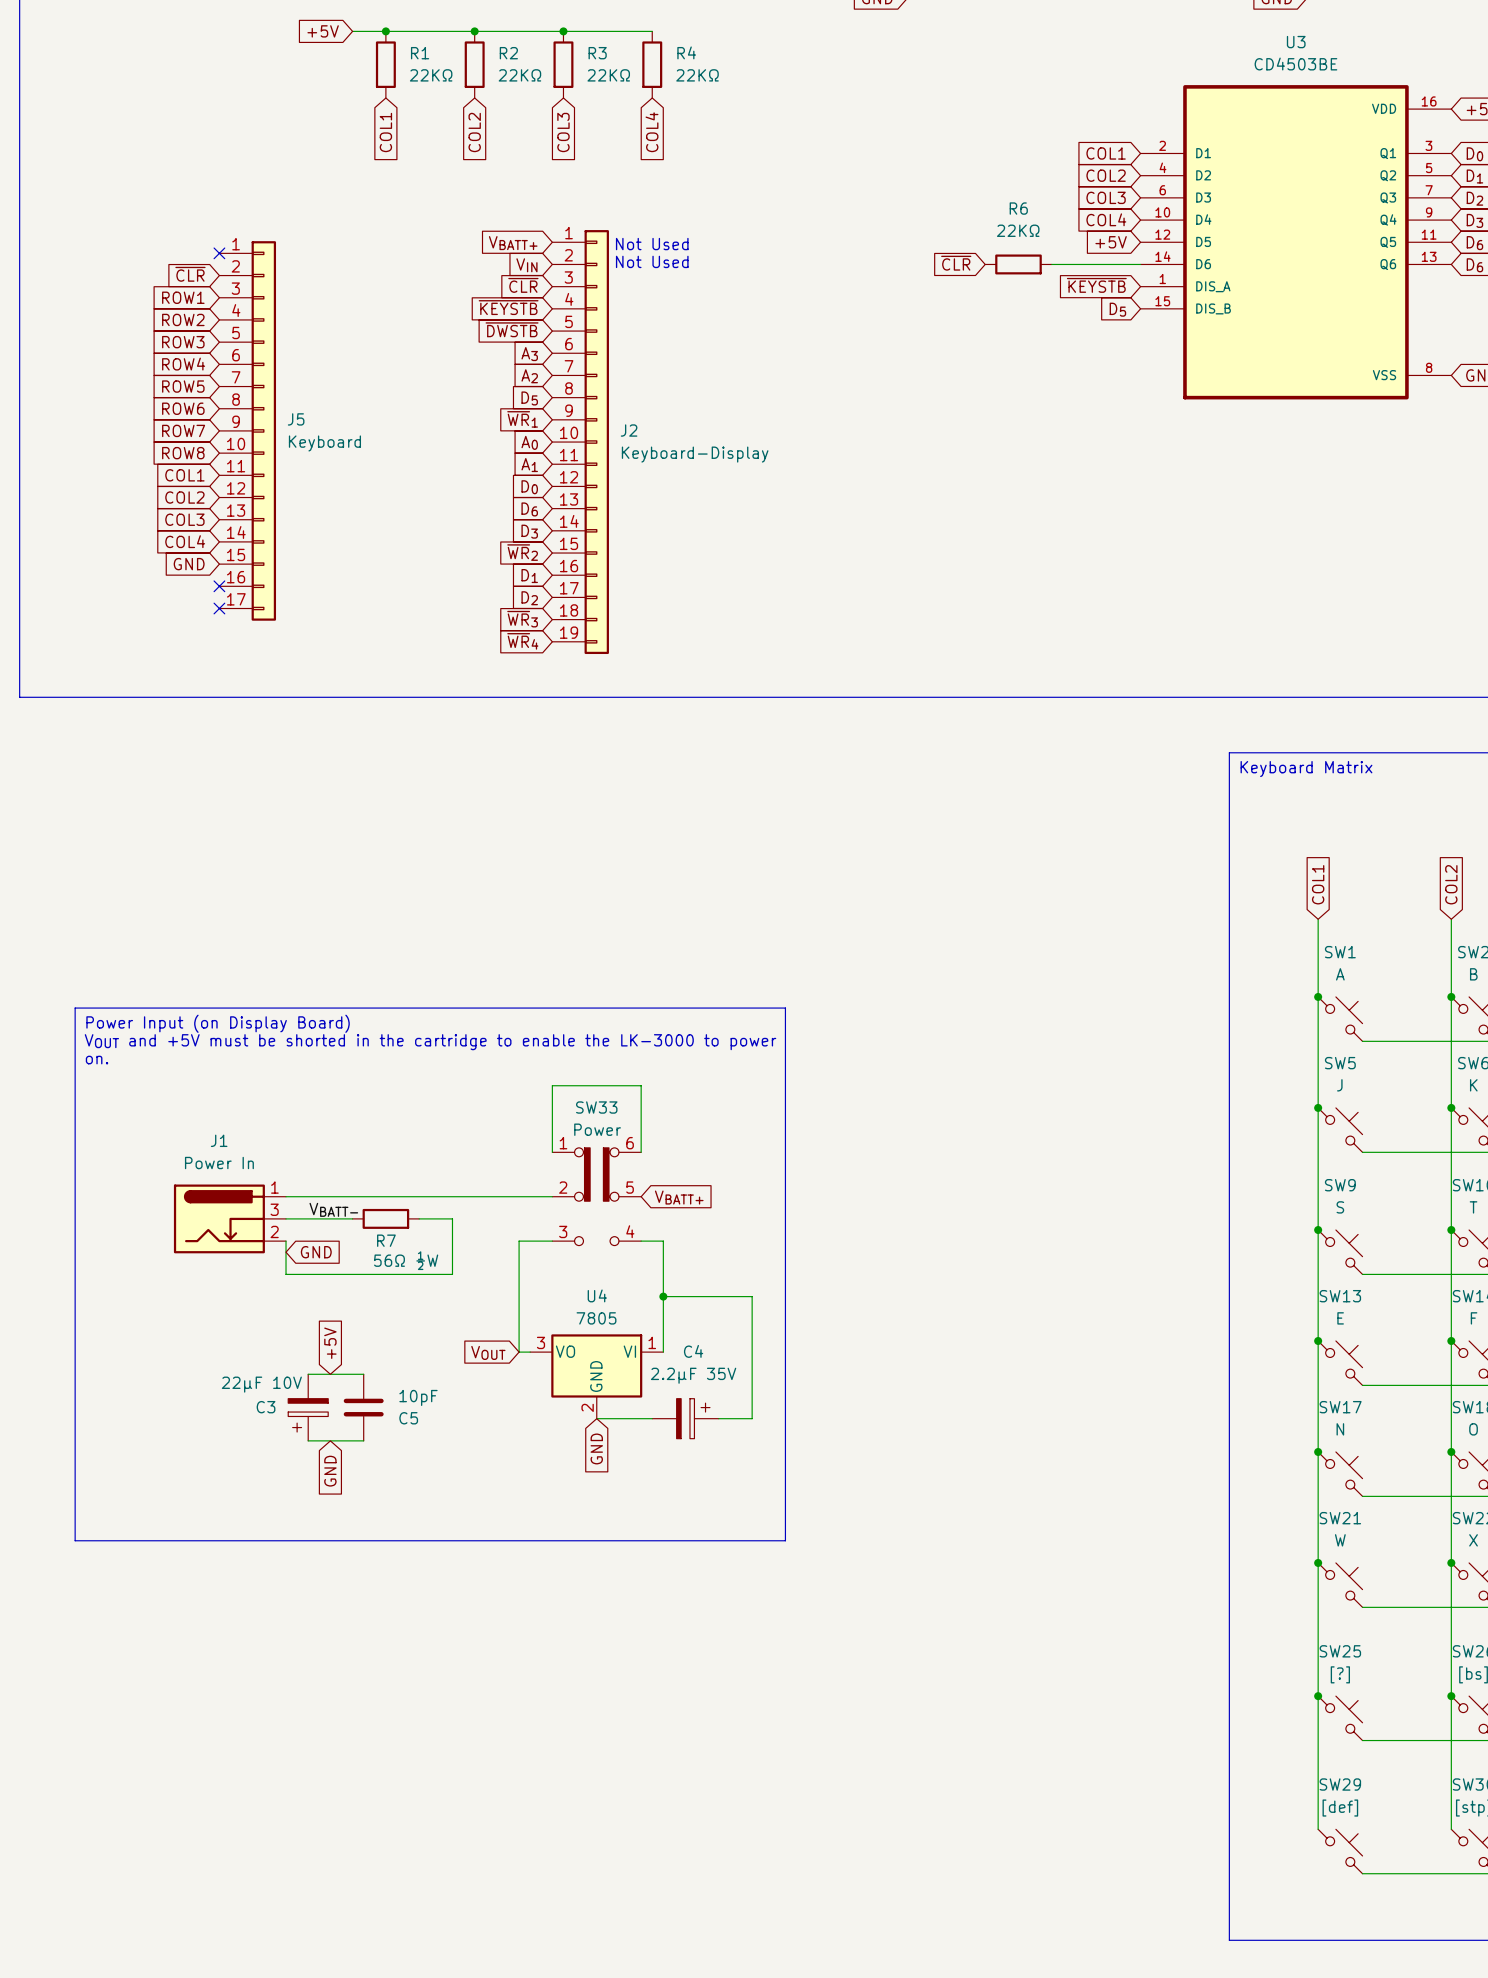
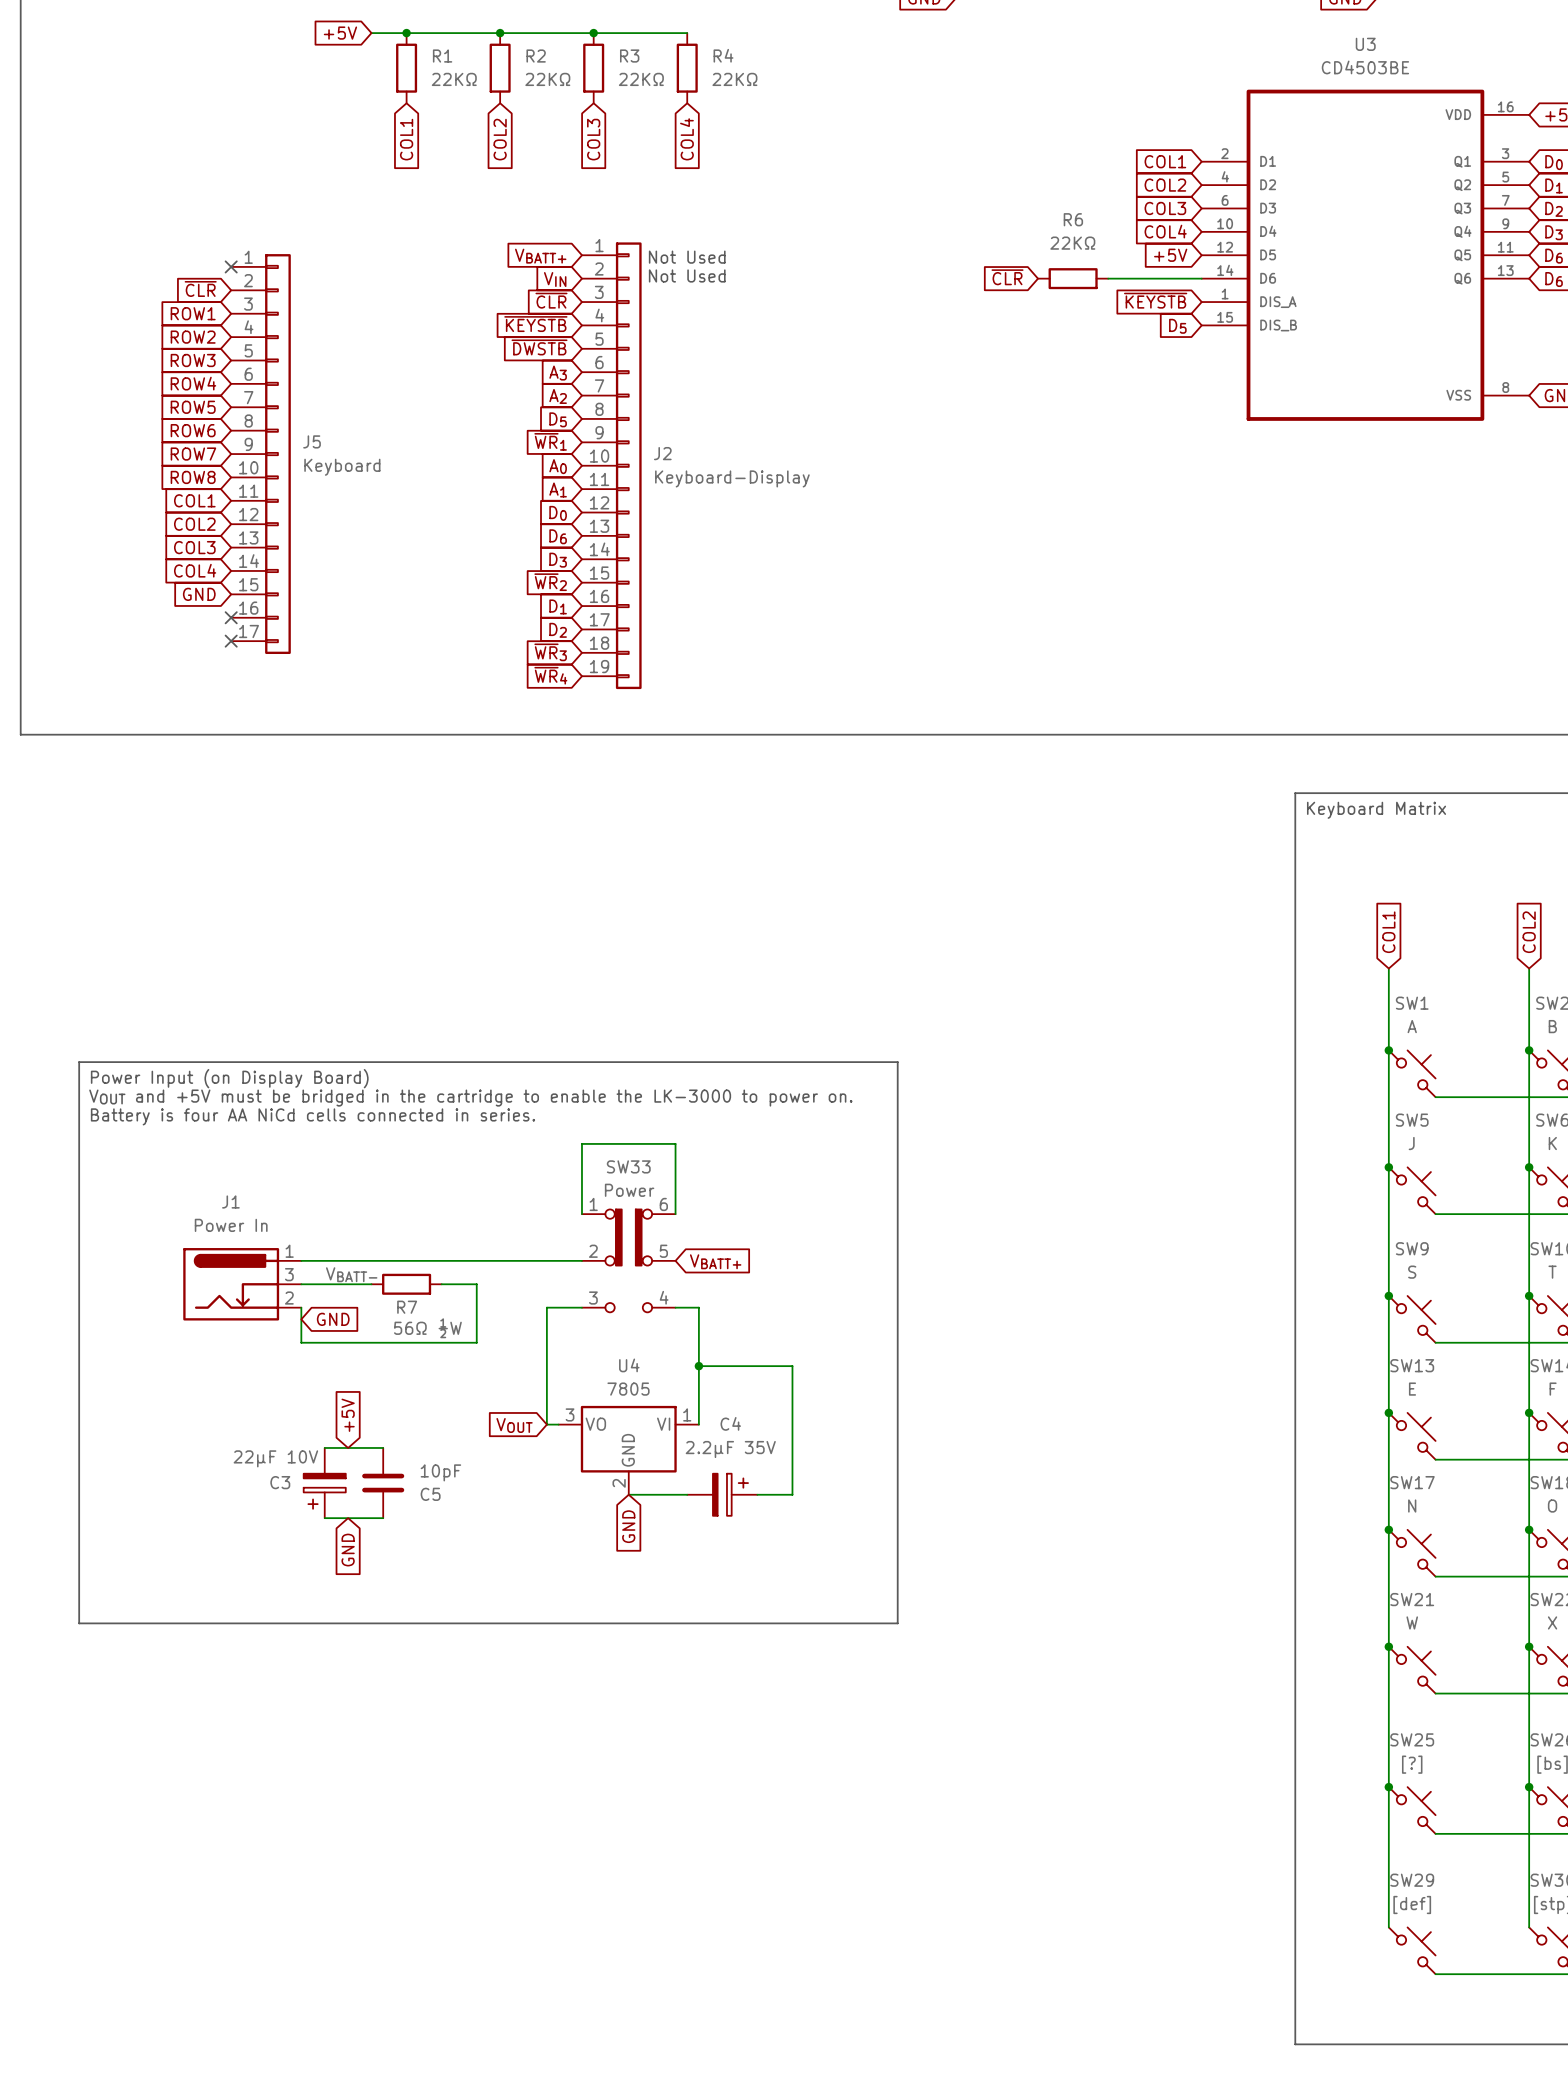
line: (785, 1008) (785, 1540) -> (827, 1062) (897, 1062) (897, 1623) (827, 1623)
text: VOUT and +5V must be shorted in the cartridge to enable the LK-3000 to power (430, 1042) -> VOUT and +5V must be bridged in the cartridge to enable the LK-3000 to power on. (470, 1098)
text: on. (97, 1060) -> Battery is four AA NiCd cells connected in series. (312, 1116)

